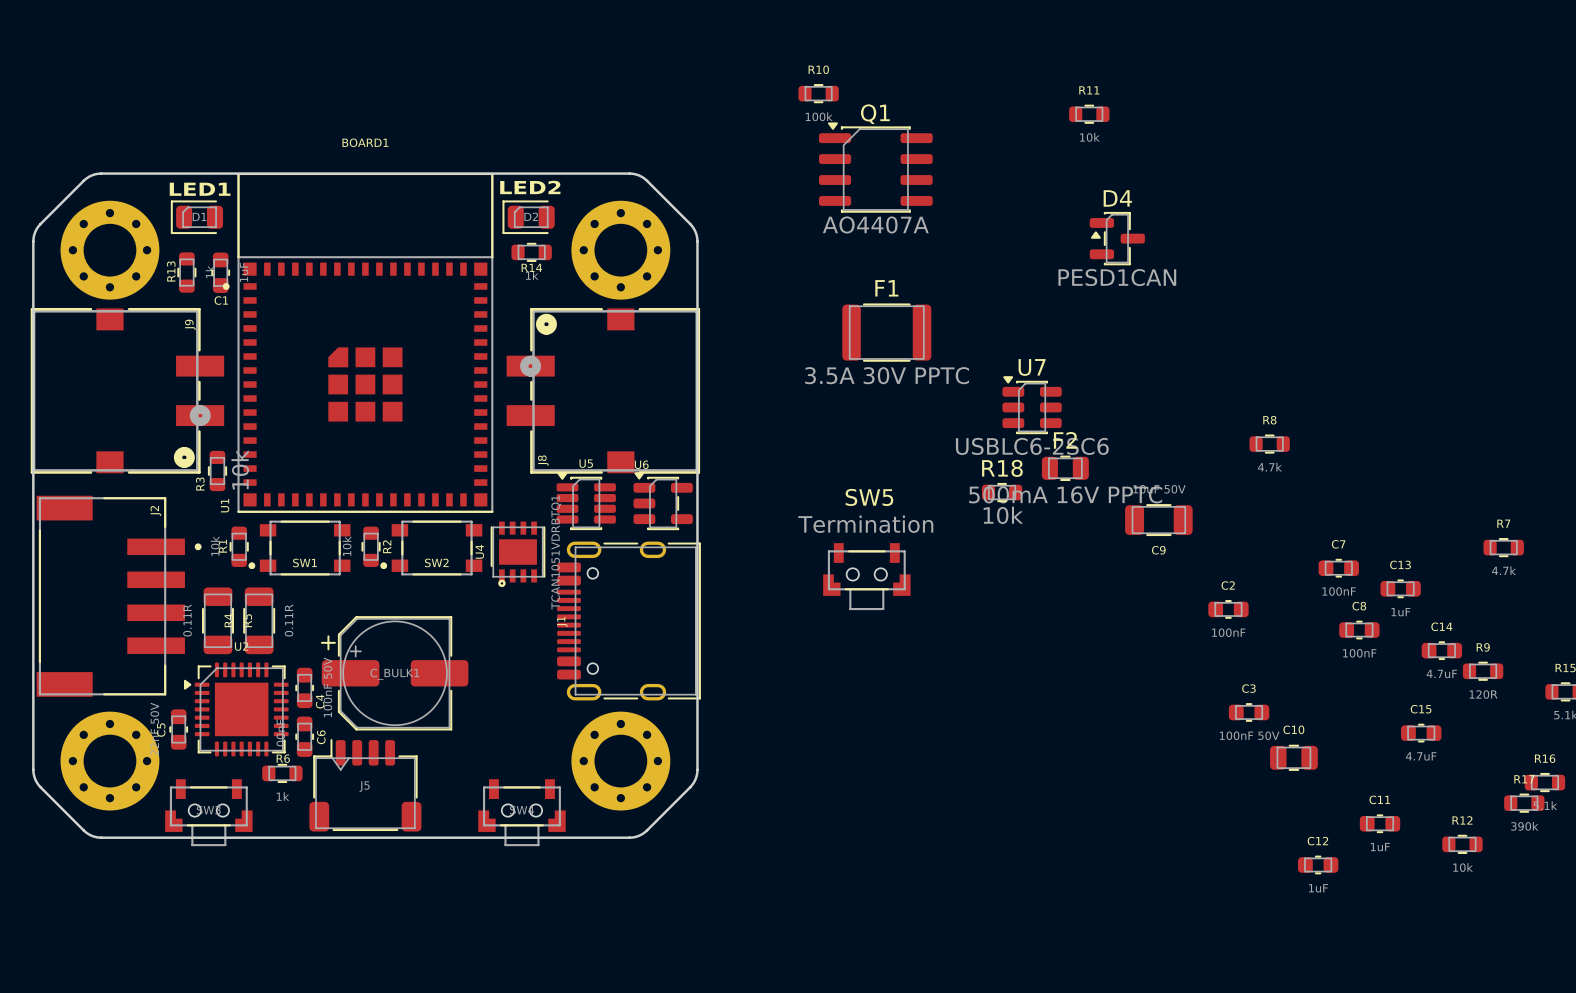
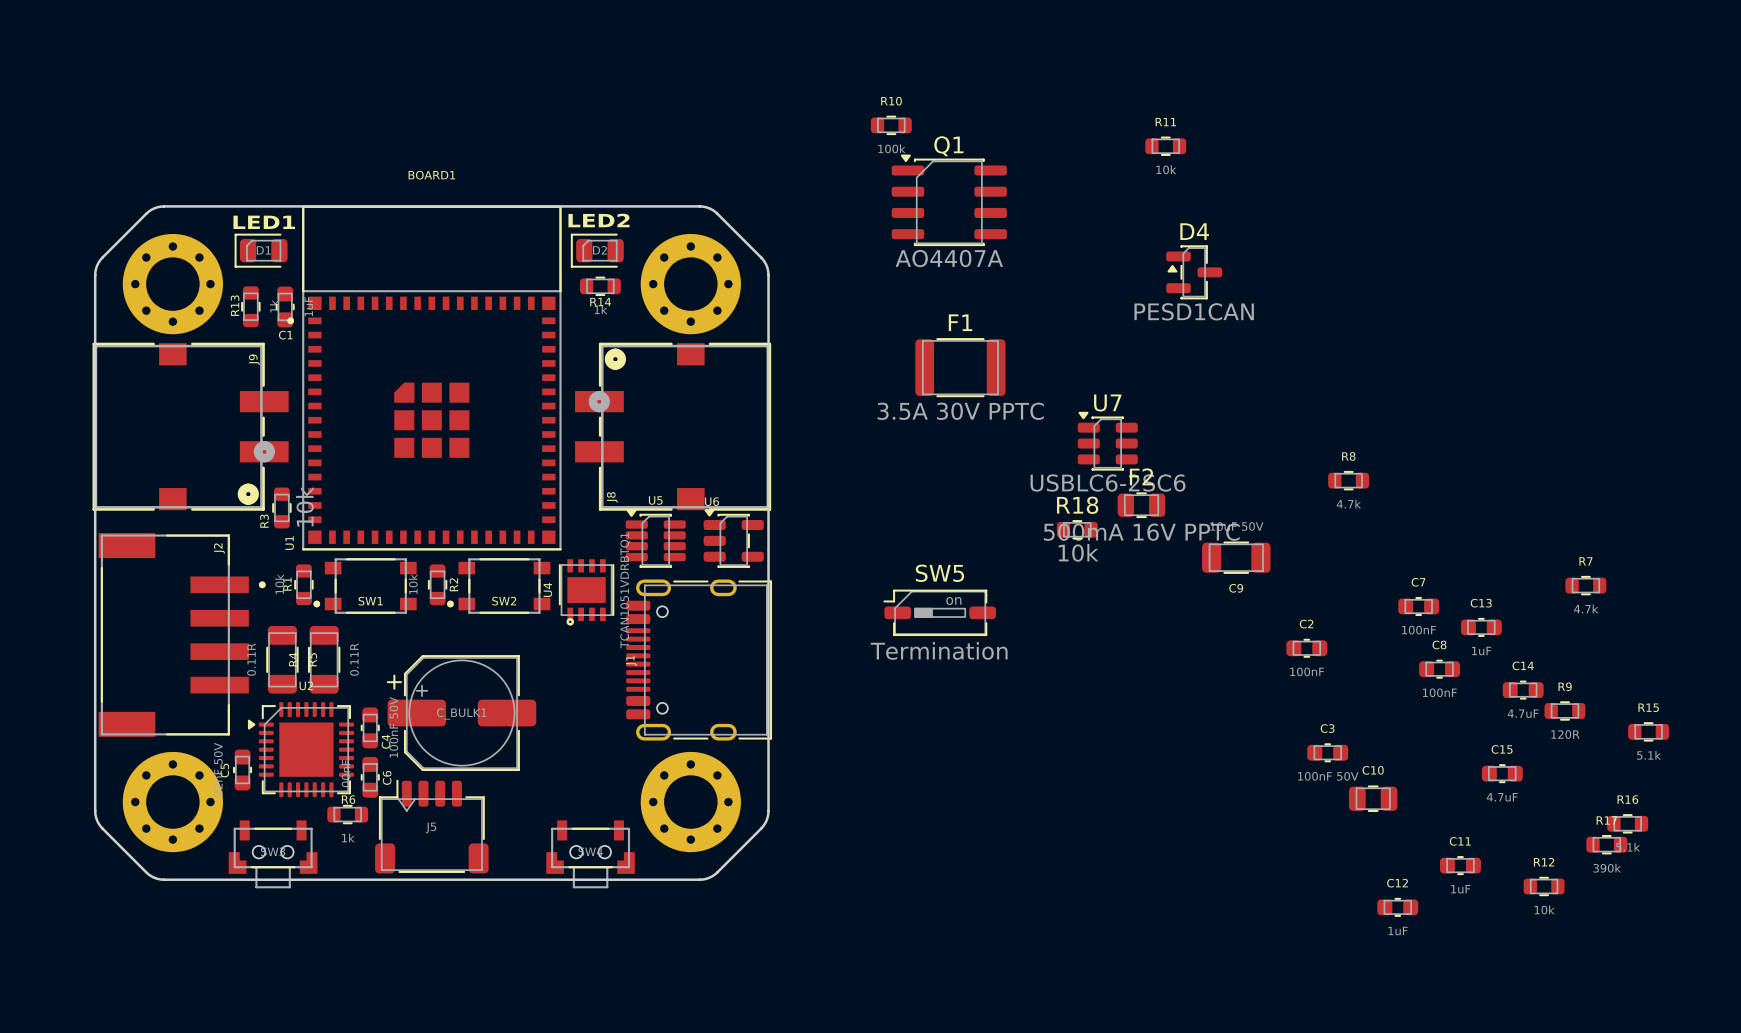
SW5 name position: SW5 (869, 497) -> SW5 (939, 573)
SW5 value position: Termination (865, 524) -> Termination (939, 650)
SW5 footprint: [823, 543, 911, 611] -> [883, 589, 996, 637]

